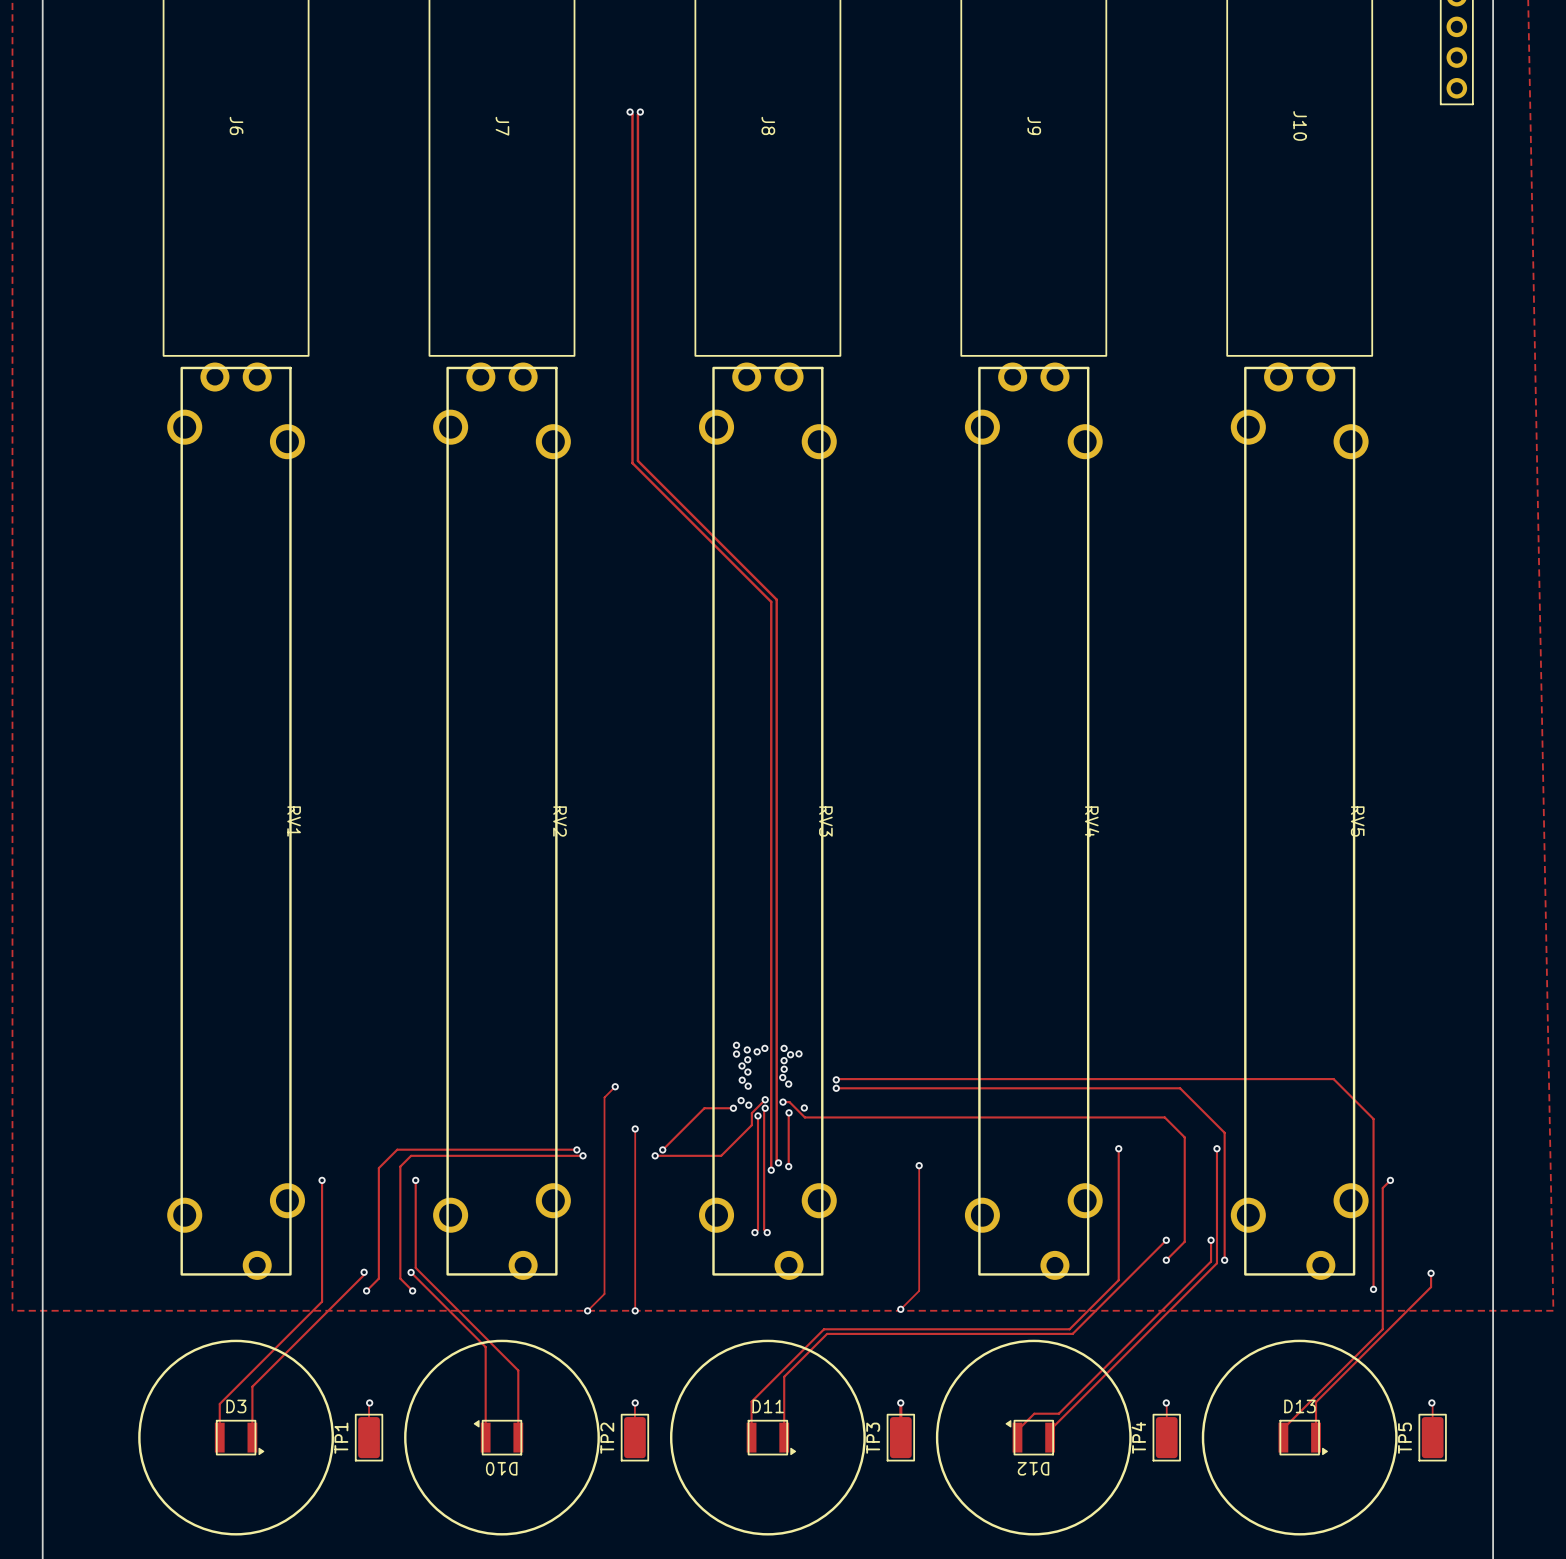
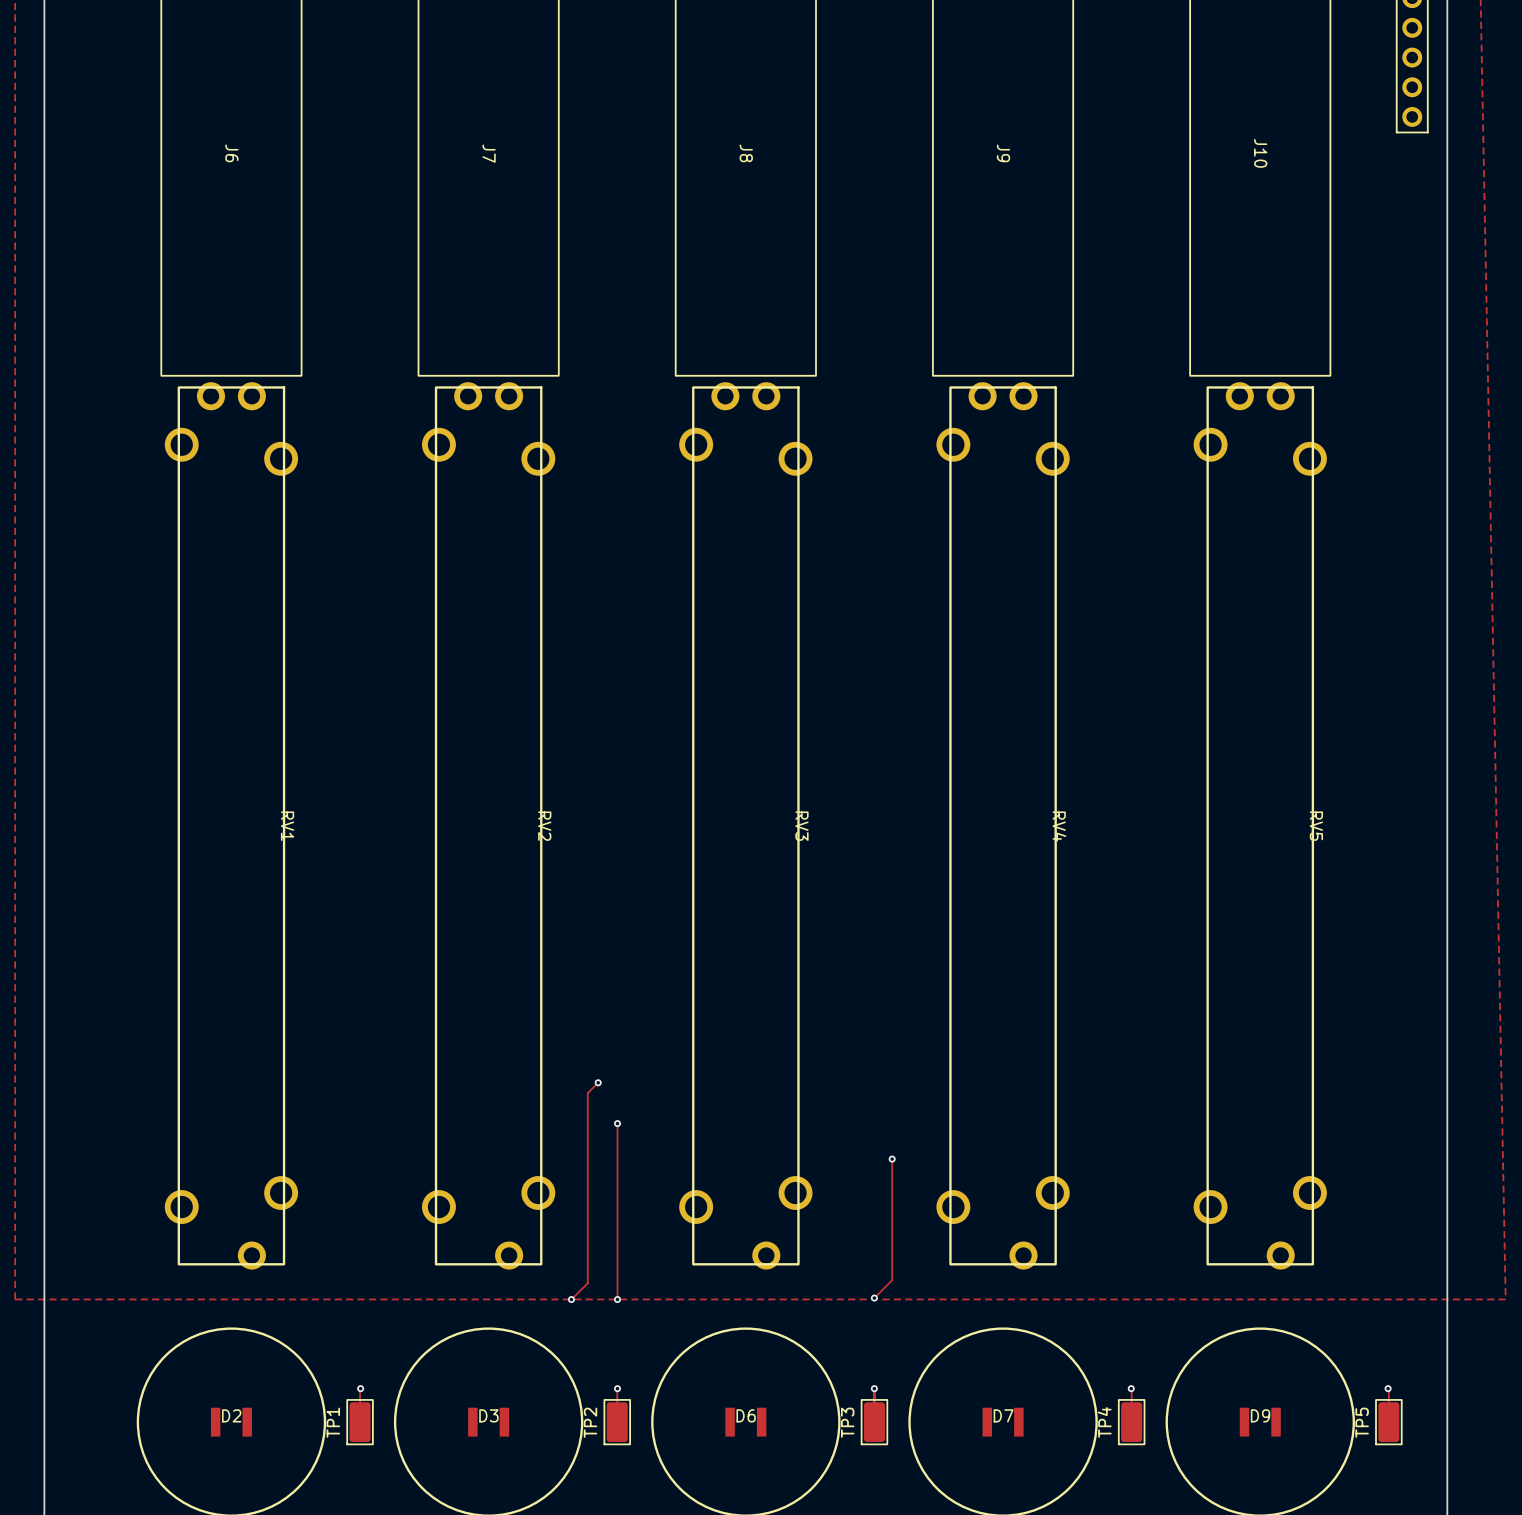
track: (630, 112) (632, 114) (632, 463) (771, 601) (771, 1170) -> none
via: (630, 112) -> none
track: (640, 112) (637, 114) (637, 460) (776, 599) (776, 1161) (778, 1162) -> none
via: (640, 112) -> none
via: (736, 1045) -> none
via: (764, 1048) -> none
via: (784, 1048) -> none
via: (747, 1049) -> none
via: (757, 1051) -> none
via: (798, 1053) -> none
via: (736, 1054) -> none
via: (790, 1054) -> none
via: (747, 1059) -> none
via: (784, 1060) -> none
via: (742, 1065) -> none
via: (784, 1069) -> none
via: (747, 1072) -> none
via: (782, 1077) -> none
track: (836, 1079) (1333, 1079) (1373, 1118) (1373, 1289) -> none
via: (836, 1079) -> none
via: (742, 1080) -> none
via: (788, 1084) -> none
via: (748, 1086) -> none
track: (836, 1088) (836, 1089) (837, 1088) (1180, 1088) (1224, 1132) (1224, 1260) -> none
via: (836, 1088) -> none
track: (765, 1099) (751, 1113) (751, 1125) (721, 1155) (655, 1155) -> none
via: (765, 1099) -> none
via: (741, 1100) -> none
track: (783, 1102) (789, 1102) (804, 1117) (1164, 1117) (1184, 1137) (1184, 1241) (1166, 1260) -> none
via: (783, 1102) -> none
via: (748, 1105) -> none
via: (804, 1107) -> none
track: (733, 1108) (704, 1108) (662, 1149) -> none
via: (733, 1108) -> none
track: (765, 1108) (764, 1229) (767, 1232) -> none
via: (765, 1108) -> none
track: (789, 1112) (788, 1166) -> none
via: (789, 1112) -> none
track: (758, 1115) (758, 1229) (754, 1232) -> none
via: (758, 1115) -> none
track: (1118, 1148) (1118, 1280) (1069, 1329) (824, 1329) (751, 1401) (751, 1437) -> none
via: (1118, 1148) -> none
track: (1216, 1148) (1216, 1263) (1050, 1430) (1050, 1437) -> none
via: (1216, 1148) -> none
track: (576, 1149) (397, 1149) (378, 1168) (378, 1278) (366, 1290) -> none
via: (576, 1149) -> none
via: (662, 1149) -> none
track: (583, 1155) (411, 1155) (400, 1166) (400, 1278) (412, 1290) -> none
via: (583, 1155) -> none
via: (655, 1155) -> none
via: (778, 1162) -> none
via: (788, 1166) -> none
via: (771, 1170) -> none
track: (322, 1180) (322, 1301) (219, 1403) (219, 1437) -> none
via: (322, 1180) -> none
track: (415, 1180) (415, 1267) (518, 1370) (518, 1437) -> none
via: (415, 1180) -> none
track: (1390, 1180) (1382, 1188) (1382, 1329) (1283, 1428) (1283, 1437) -> none
via: (1390, 1180) -> none
via: (754, 1232) -> none
via: (767, 1232) -> none
track: (1166, 1240) (1072, 1333) (827, 1333) (784, 1376) (784, 1437) -> none
via: (1166, 1240) -> none
track: (1211, 1240) (1211, 1261) (1058, 1413) (1034, 1413) (1017, 1430) (1017, 1437) -> none
via: (1211, 1240) -> none
via: (1166, 1260) -> none
via: (1224, 1260) -> none
track: (364, 1272) (365, 1274) (252, 1386) (252, 1437) -> none
via: (364, 1272) -> none
track: (411, 1272) (485, 1347) (485, 1437) -> none
via: (411, 1272) -> none
track: (1431, 1273) (1431, 1287) (1316, 1402) (1316, 1437) -> none
via: (1431, 1273) -> none
via: (1373, 1289) -> none
via: (366, 1290) -> none
via: (412, 1290) -> none
D3 name position: D3 (236, 1406) -> D3 (488, 1415)
D3 footprint: [214, 1420, 265, 1456] -> [468, 1407, 510, 1437]
D2: none -> (231, 1422)
D10: (498, 1437) -> none
D6: none -> (745, 1422)
D11: (771, 1437) -> none
D12: (1030, 1437) -> none
D7: none -> (1003, 1422)
D9: none -> (1260, 1422)
D13: (1303, 1437) -> none

